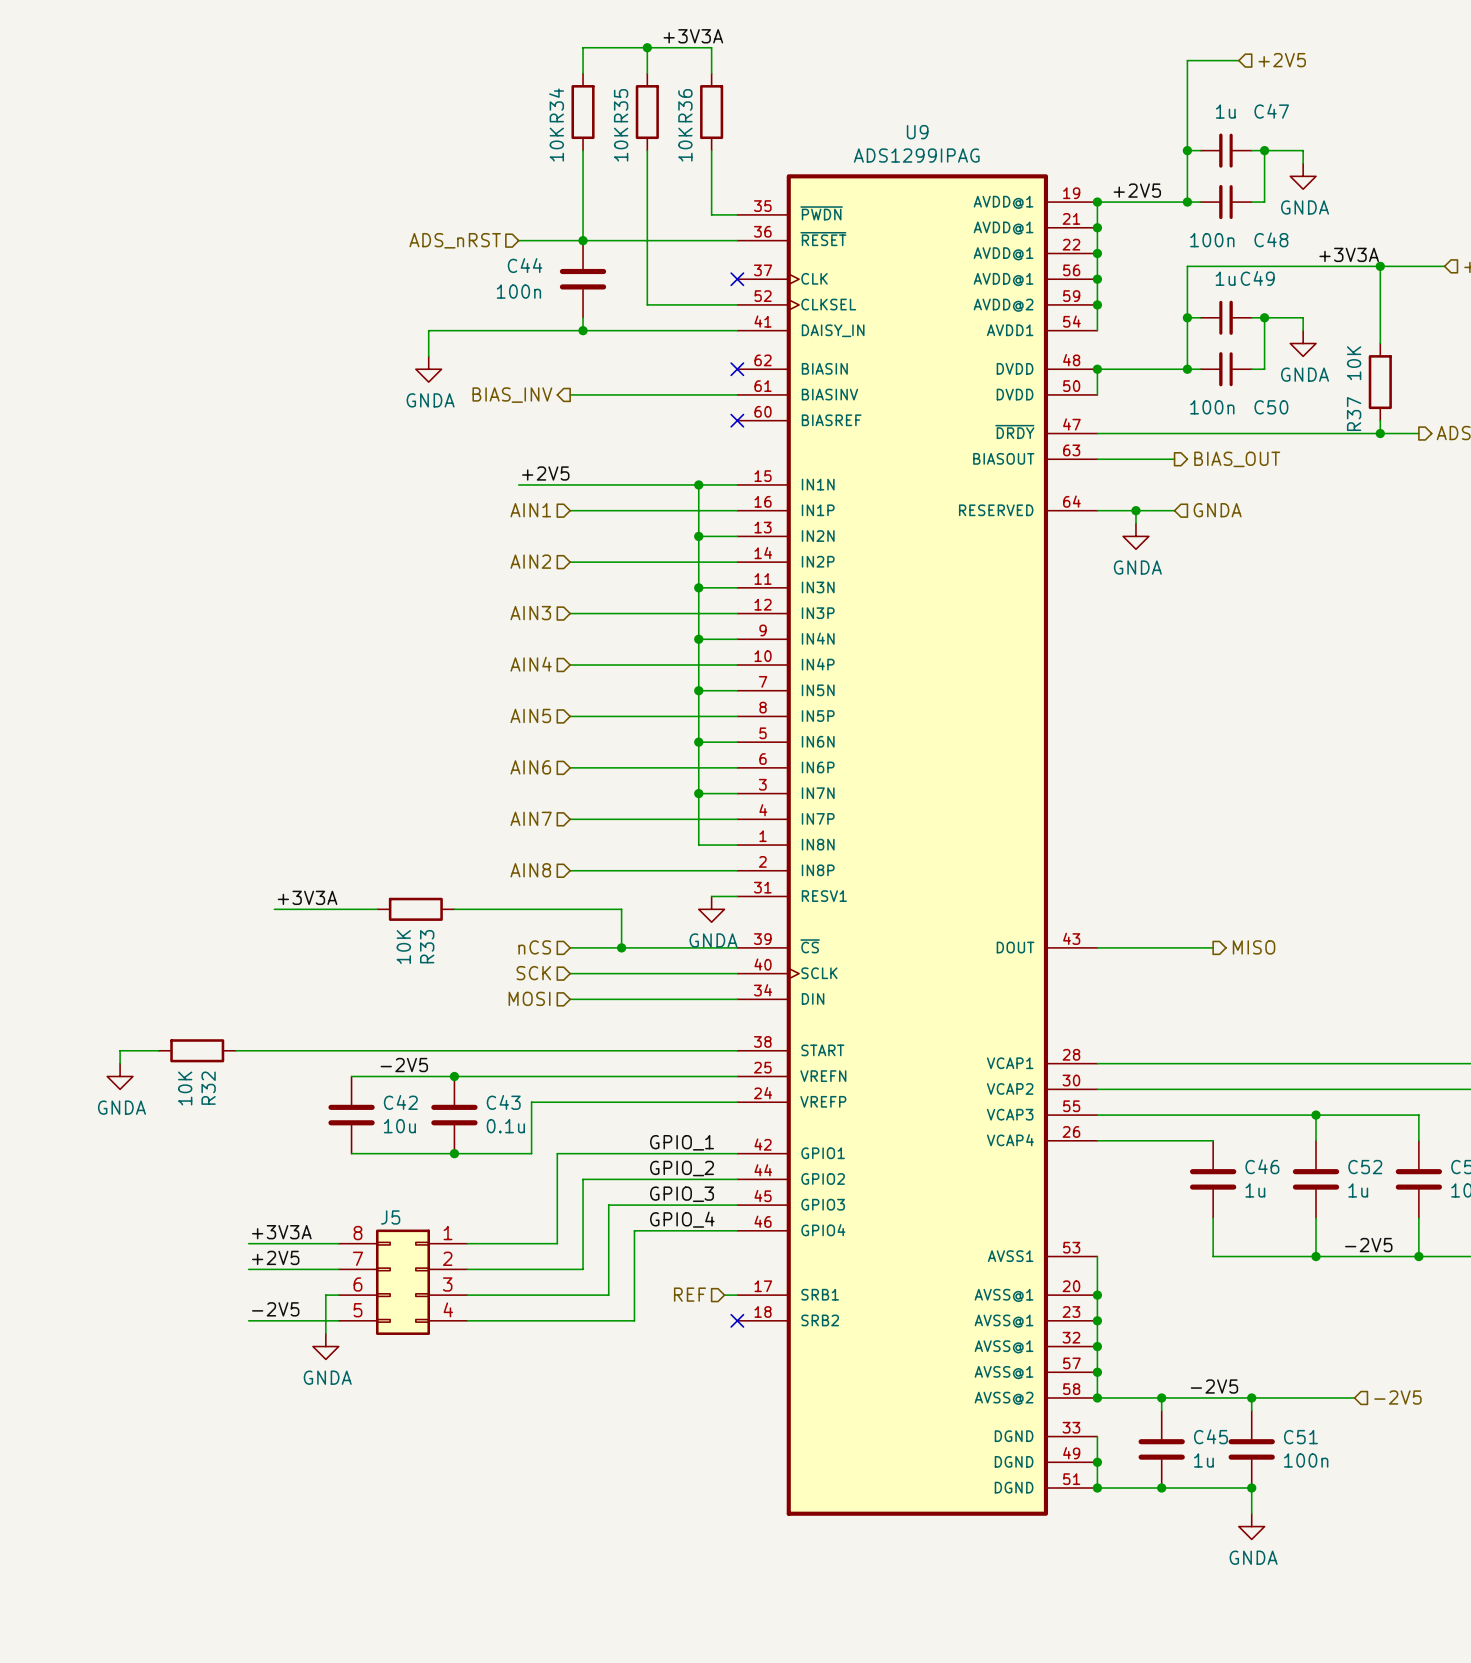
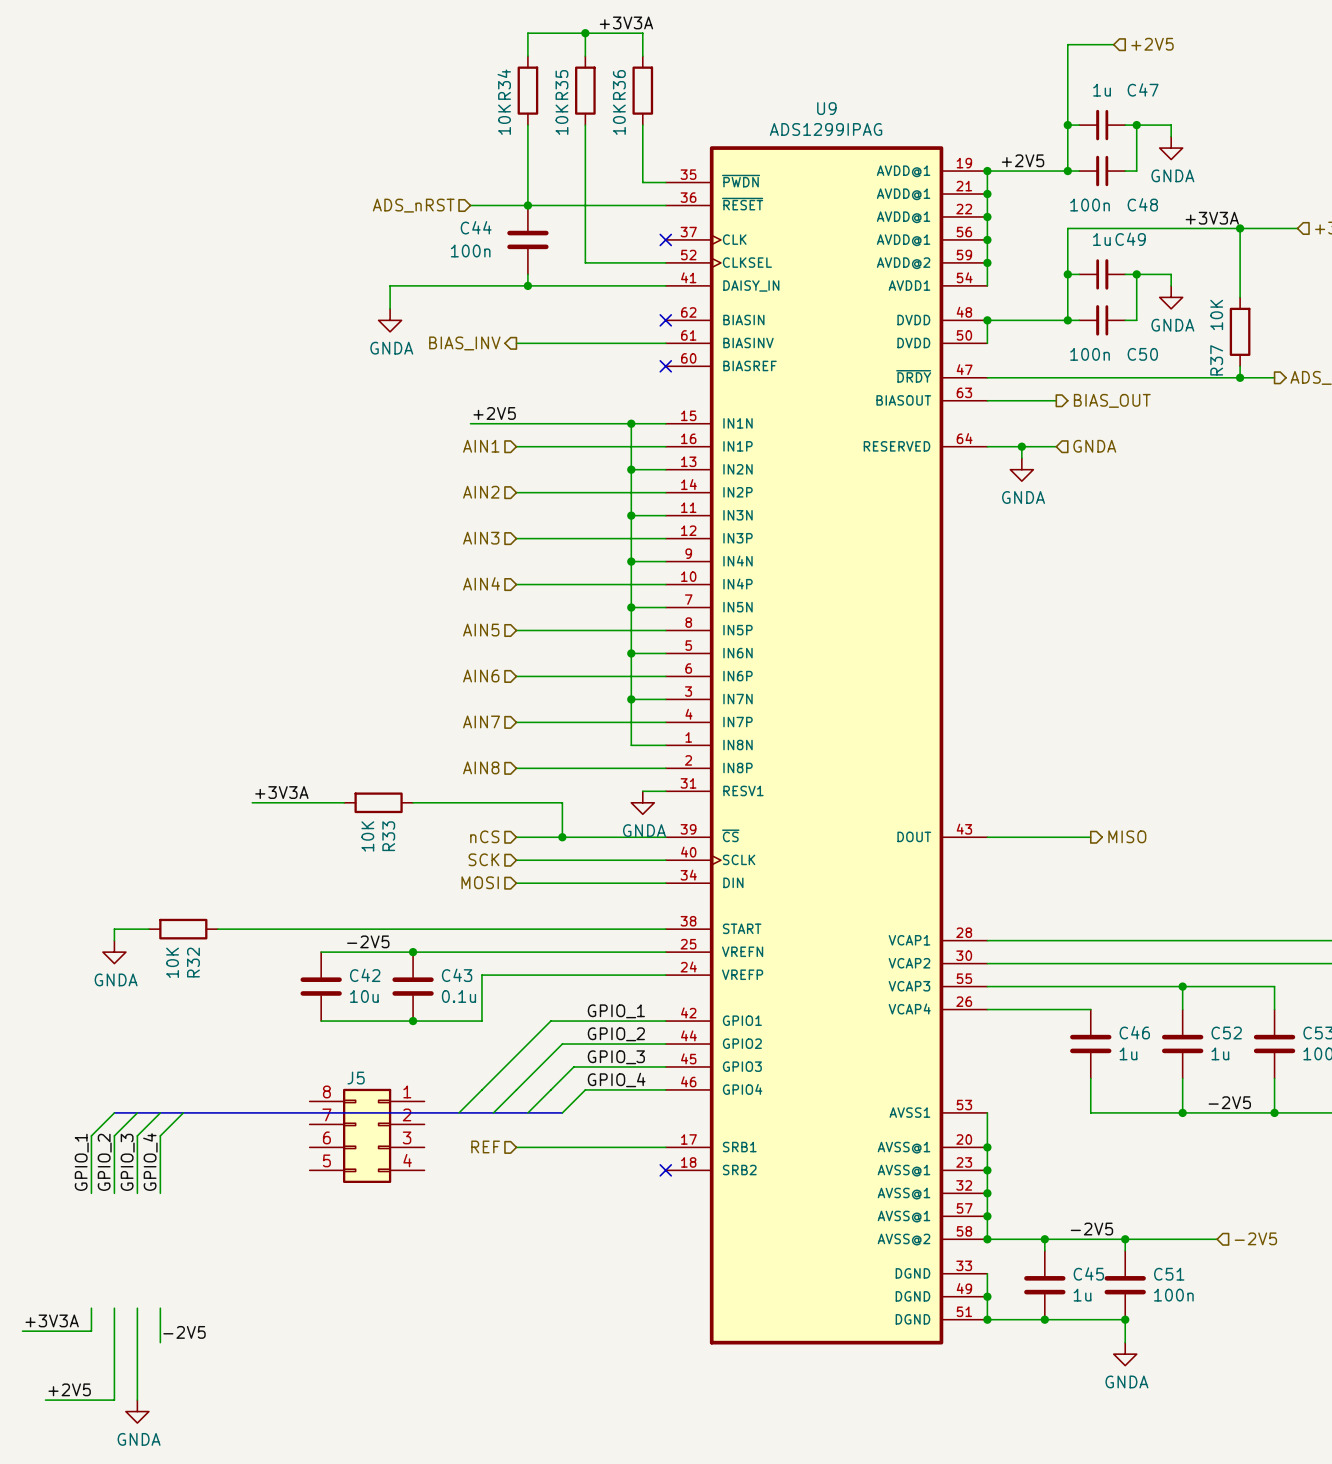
wire: (608, 1153) (557, 1153) (557, 1243) (467, 1243) -> (550, 1021) (459, 1112)
wire: (621, 1179) (583, 1179) (583, 1269) (467, 1269) -> (562, 1044) (493, 1112)
wire: (634, 1205) (608, 1205) (608, 1295) -> (573, 1066) (527, 1112)
wire: (647, 1230) (634, 1230) (634, 1320) (467, 1320) -> (585, 1089) (562, 1112)
label: +3V3A (281, 1232) -> none
wire: (248, 1243) (338, 1243) -> none
wire: none -> (114, 1112) (91, 1135) (91, 1193)
bus: none -> (114, 1112) (562, 1112)
wire: none -> (137, 1112) (114, 1135) (114, 1193)
wire: none -> (160, 1112) (137, 1135) (137, 1193)
wire: none -> (183, 1112) (160, 1135) (160, 1193)
label: +2V5 (275, 1257) -> none
wire: (248, 1269) (338, 1269) -> none
hierarchical label position: REF (689, 1294) -> REF (485, 1146)
wire: (338, 1295) (325, 1295) (325, 1333) -> none
wire: (467, 1295) (570, 1295) -> none
wire: none -> (550, 1147) (654, 1147)
label position: -2V5 (275, 1309) -> -2V5 (184, 1332)
label: none -> GPIO_1 (81, 1162)
label: none -> GPIO_2 (104, 1162)
label: none -> GPIO_3 (127, 1162)
label: none -> GPIO_4 (150, 1162)
wire: (248, 1320) (338, 1320) -> none
power symbol: GNDA (325, 1346) -> none
wire: none -> (91, 1308) (91, 1331) (22, 1331)
wire: none -> (114, 1308) (114, 1400) (45, 1400)
wire: none -> (137, 1308) (137, 1400)
wire: none -> (160, 1308) (160, 1342)
label: none -> +3V3A (52, 1320)
label: none -> +2V5 (69, 1389)
power symbol: none -> GNDA (137, 1411)

